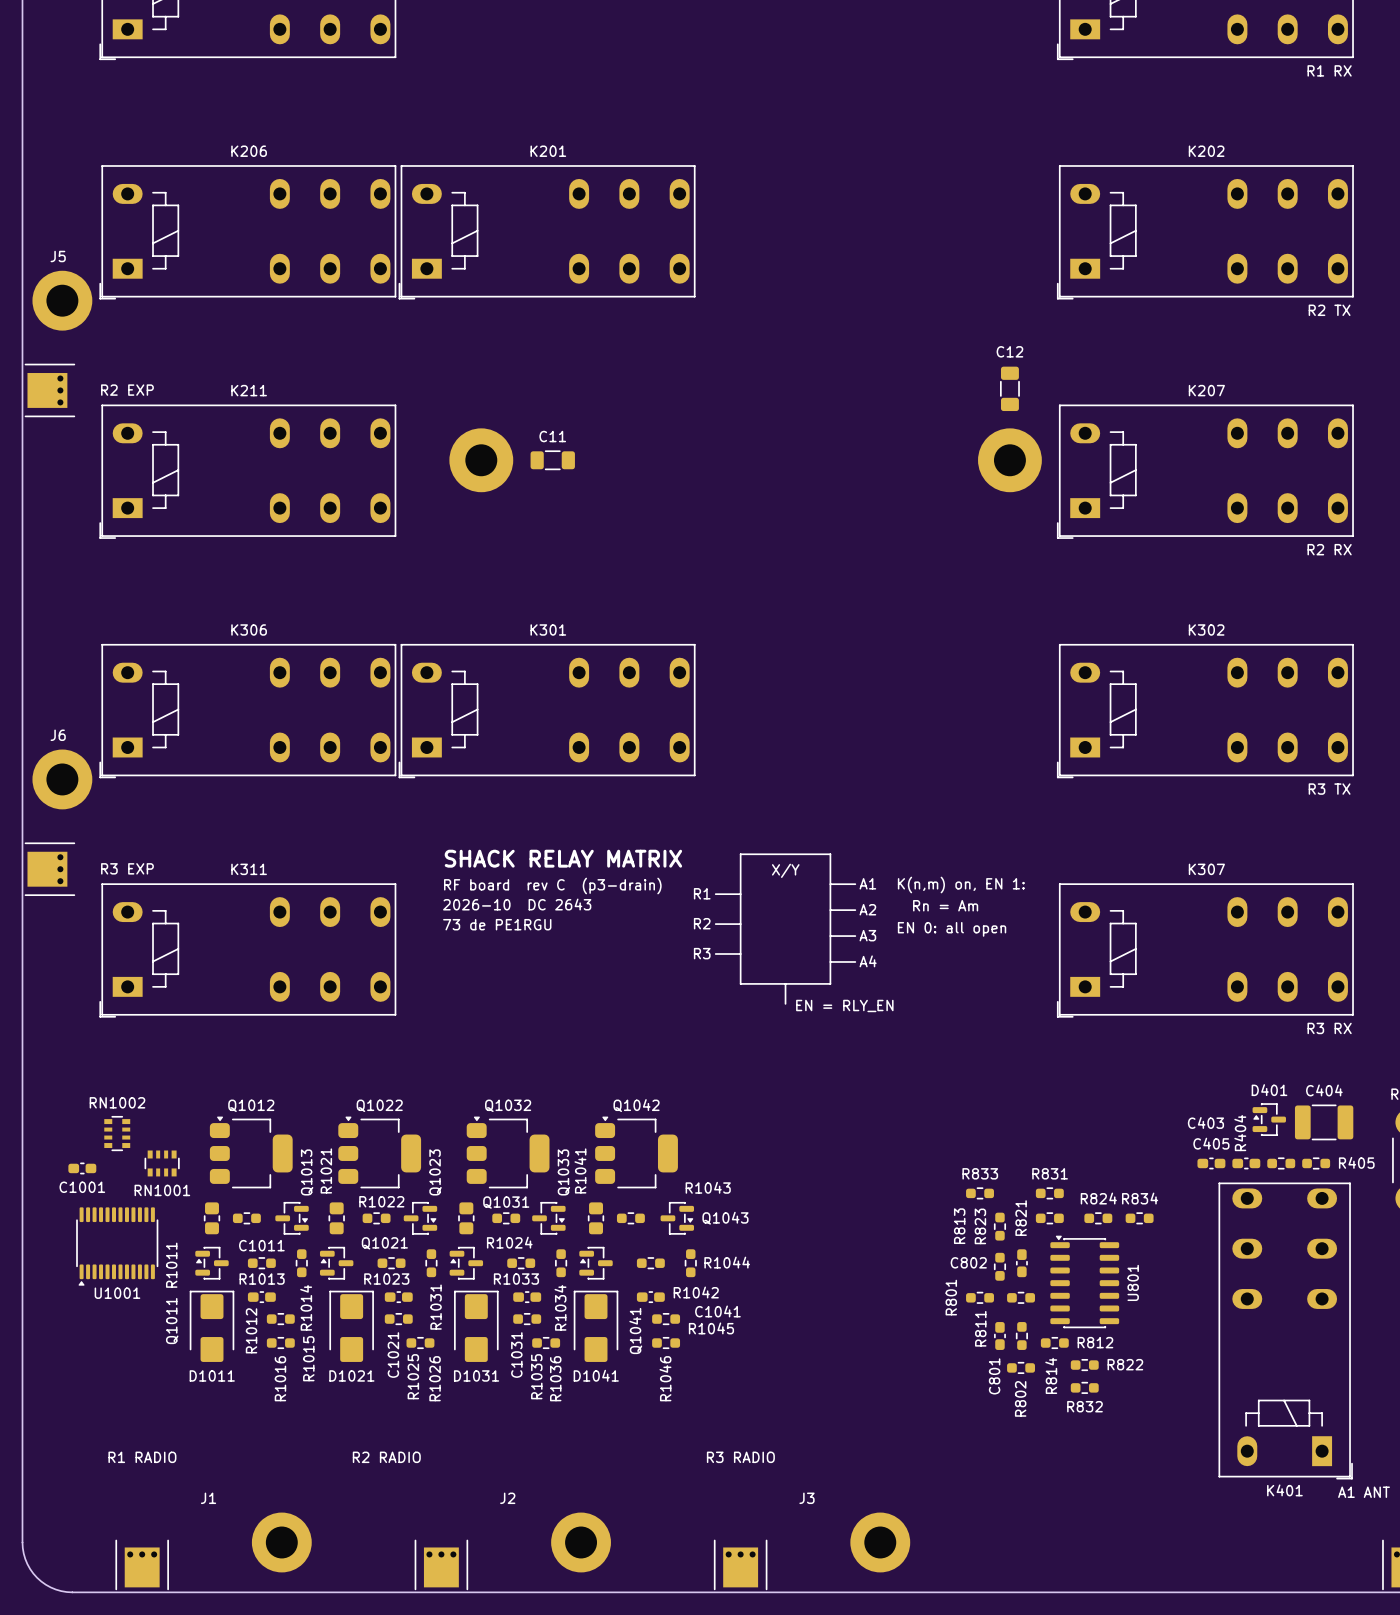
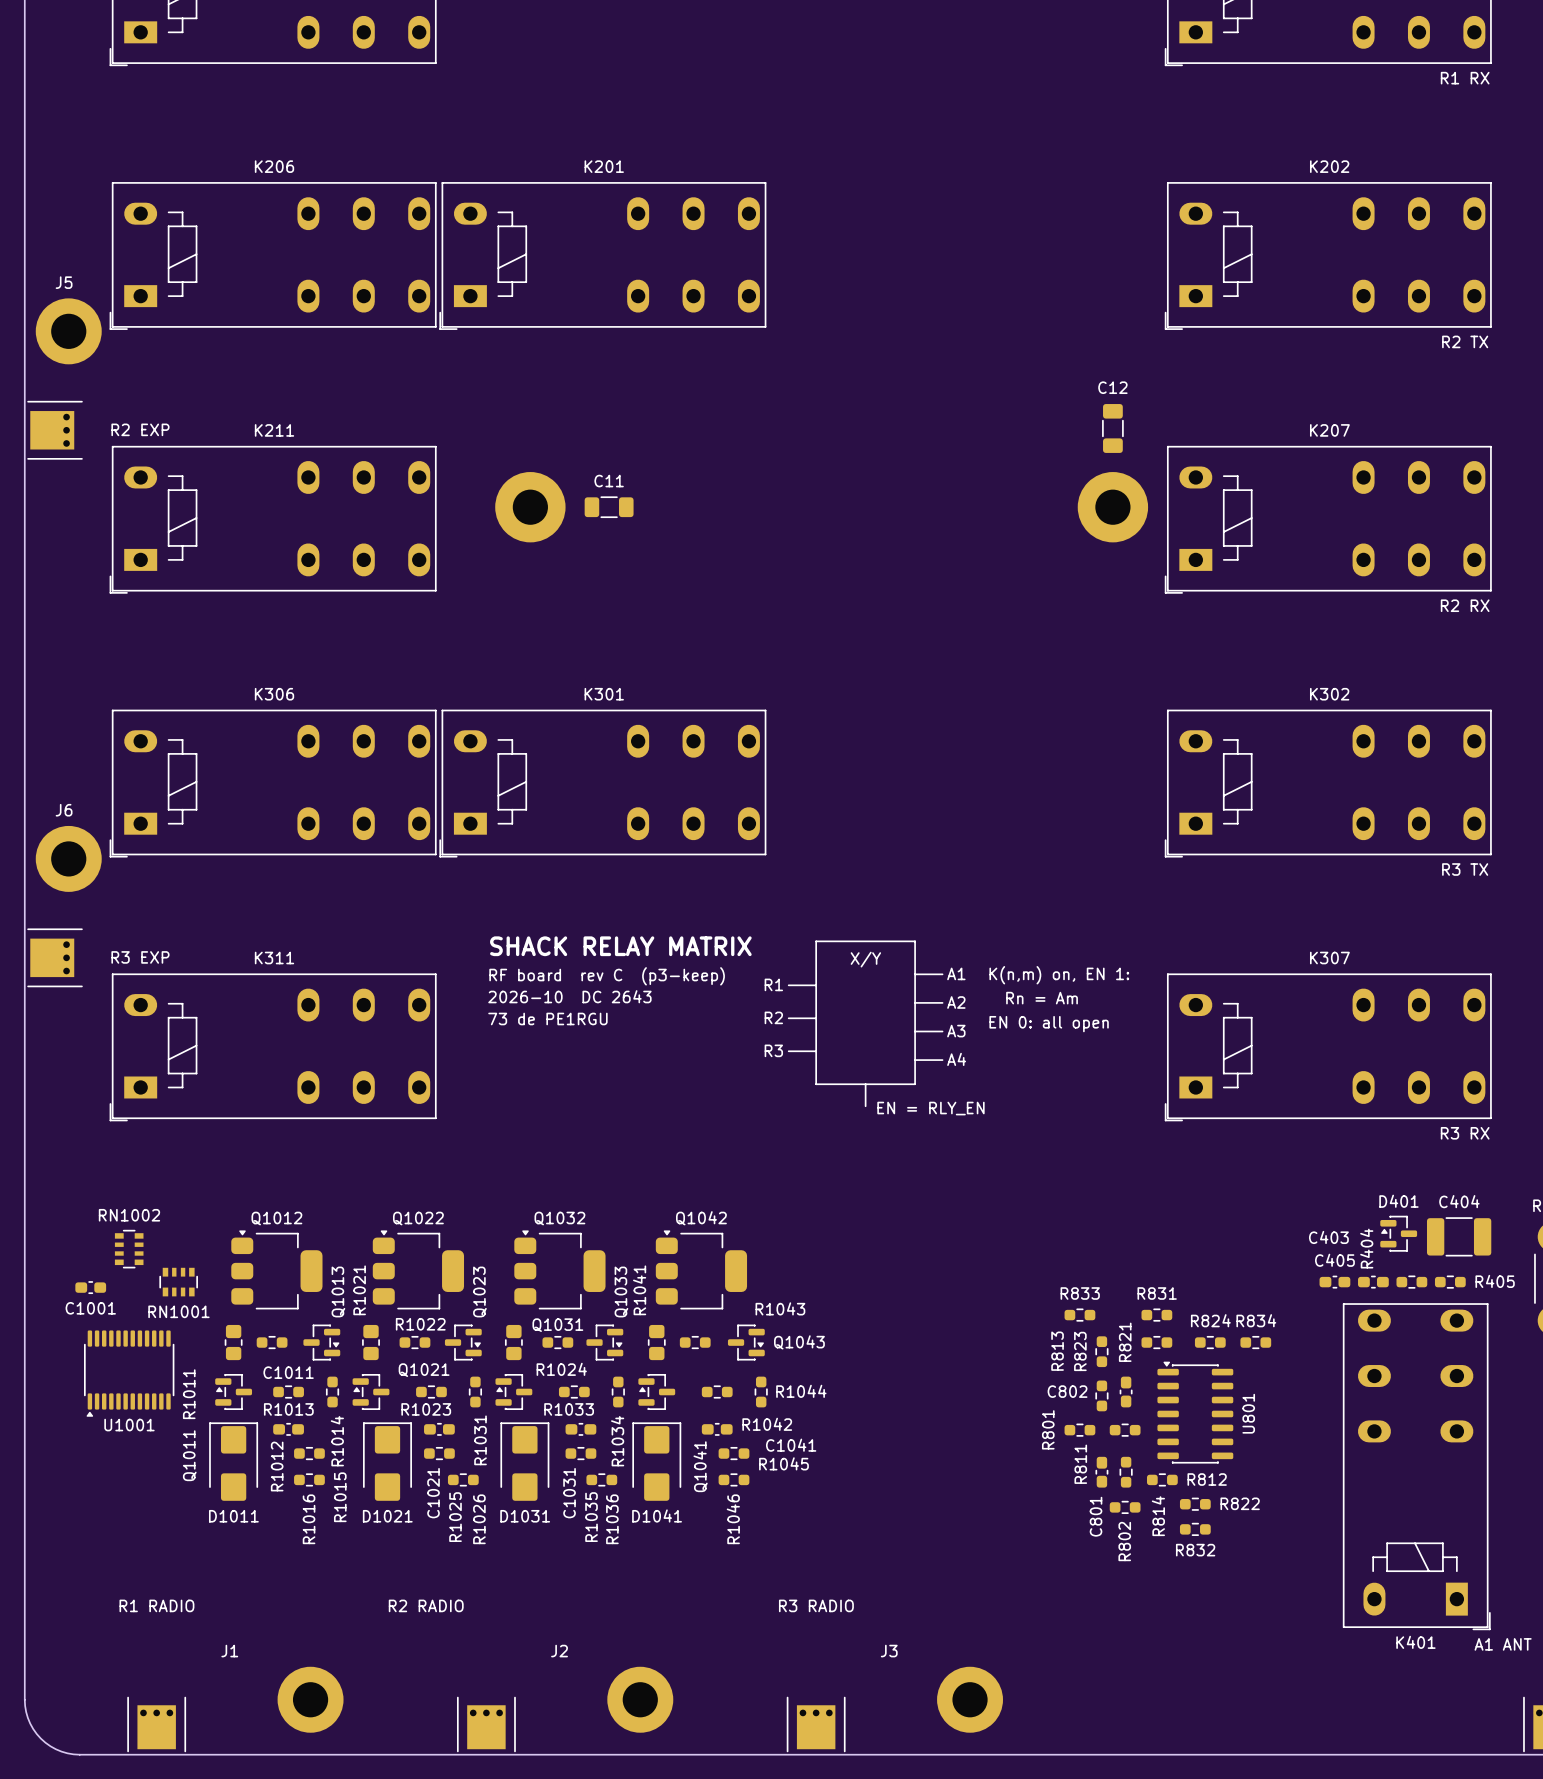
text: RF board rev C (p3-drain) (552, 886) -> RF board rev C (p3-keep) (607, 976)

